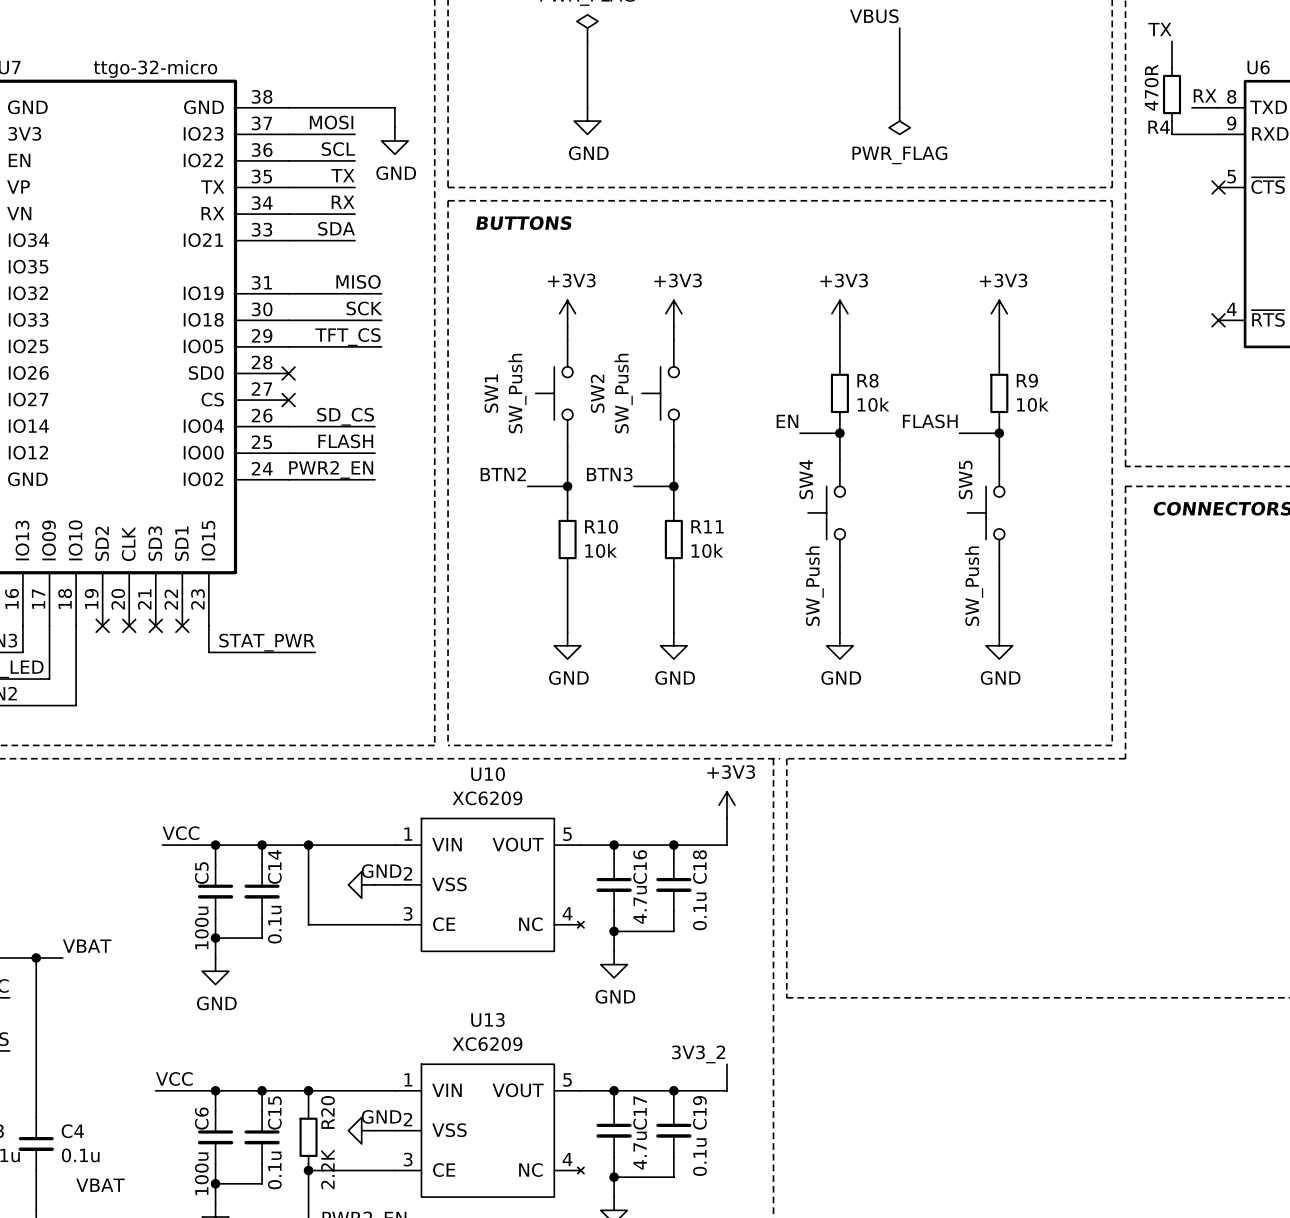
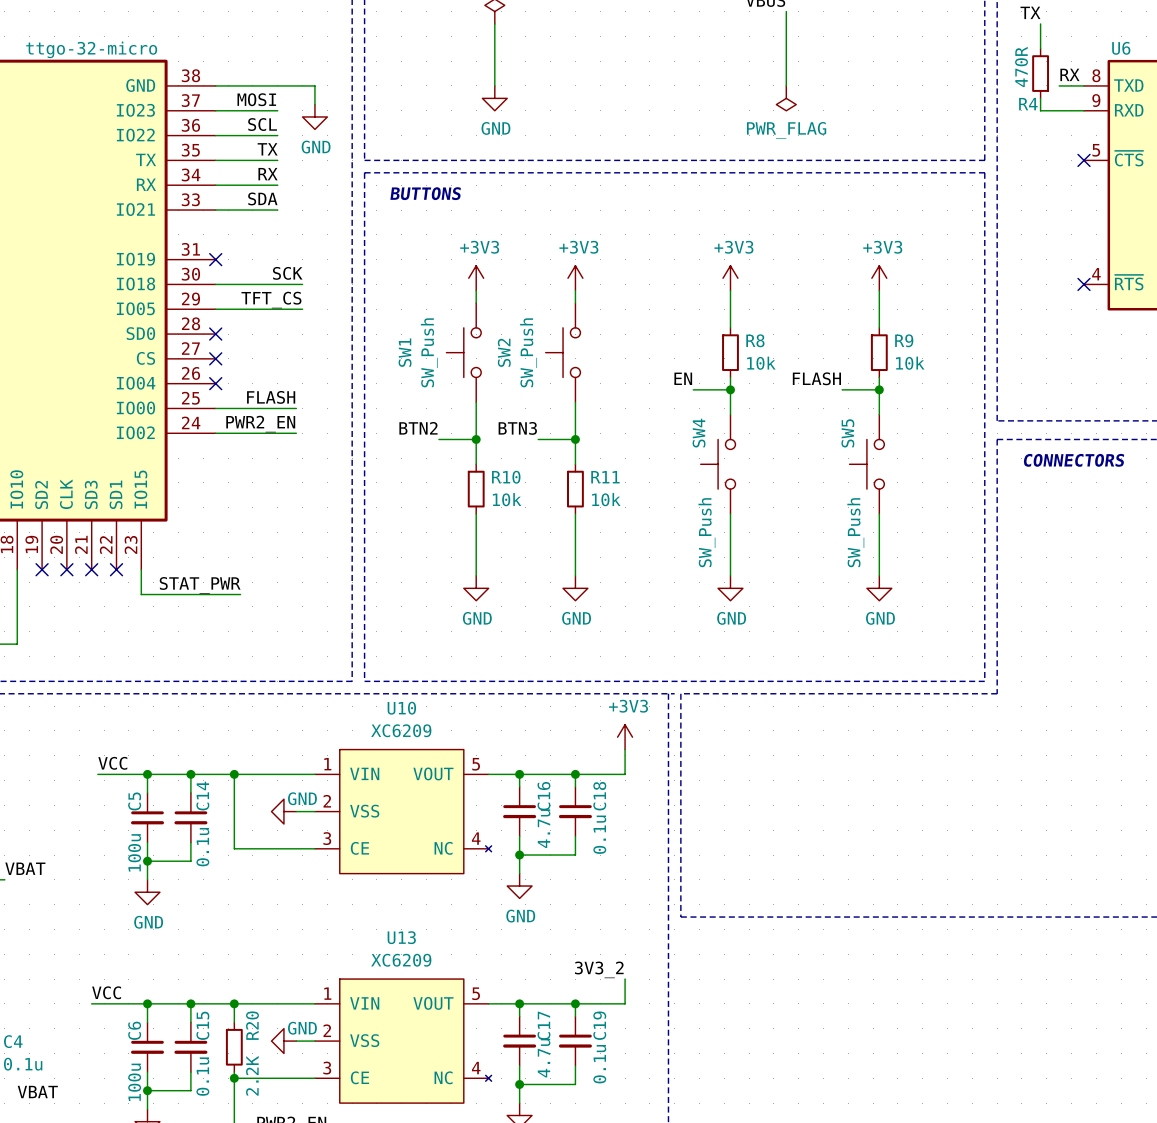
label: MISO (358, 281) -> none
wire: (288, 293) (381, 293) -> none
no-connect mark: none -> (215, 259)
label: SD_CS (345, 416) -> none
wire: (288, 426) (374, 426) -> none
no-connect mark: none -> (215, 383)

